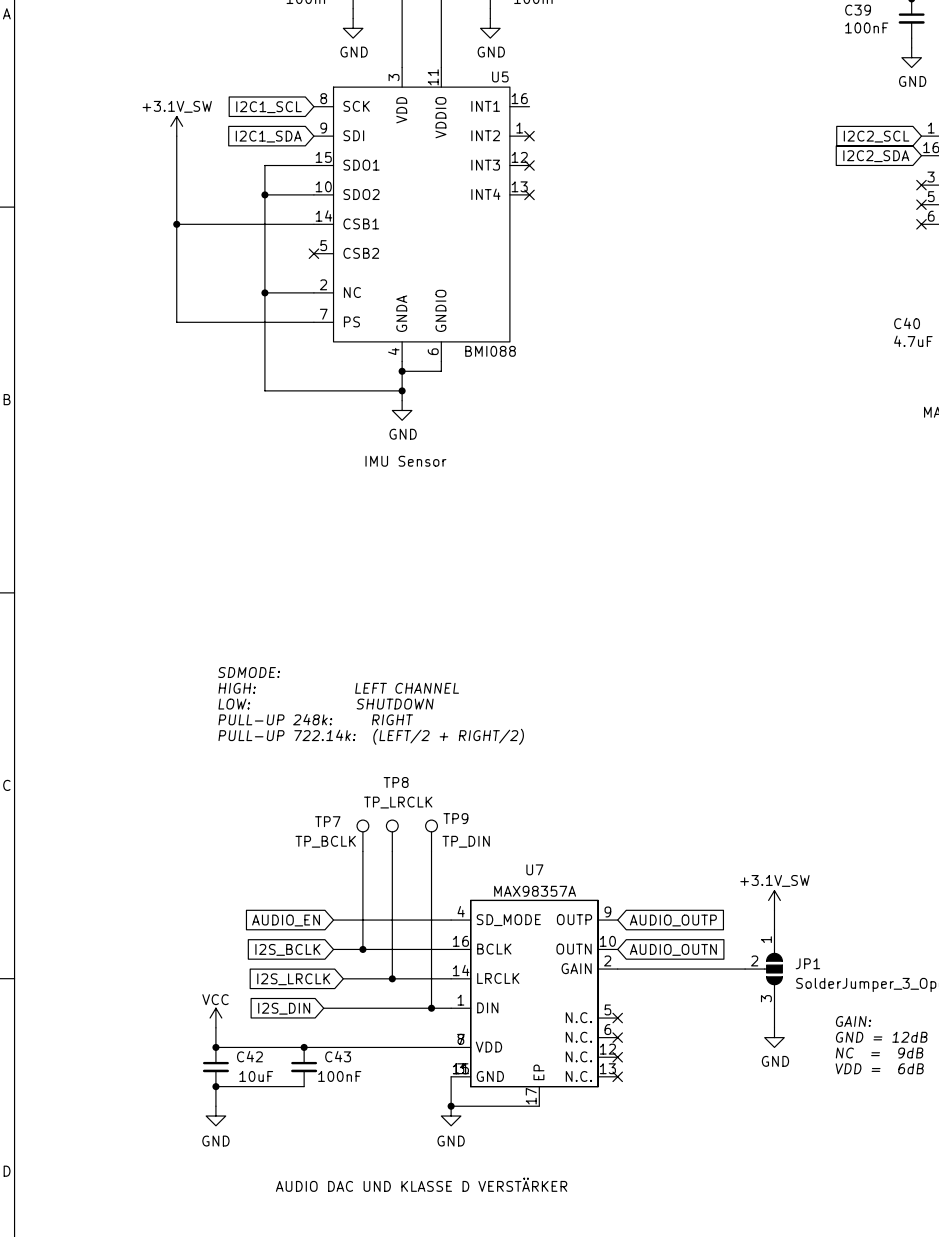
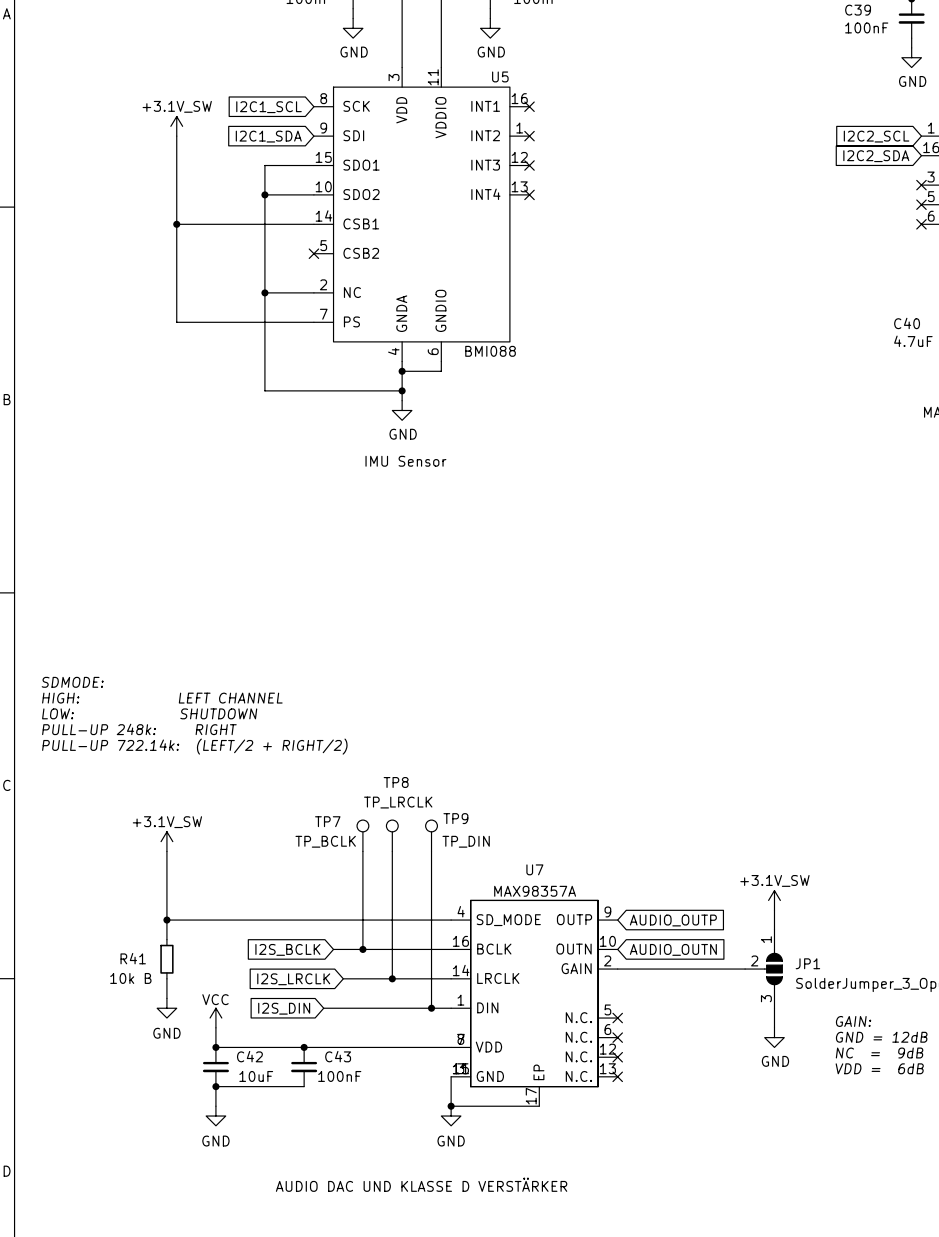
no-connect mark: none -> (529, 106)
text position: SDMODE: (249, 672) -> SDMODE: (72, 682)
text position: HIGH: LEFT CHANNEL (338, 688) -> HIGH: LEFT CHANNEL (162, 698)
text position: LOW: SHUTDOWN (326, 704) -> LOW: SHUTDOWN (149, 713)
text position: PULL-UP 248k: RIGHT (315, 719) -> PULL-UP 248k: RIGHT (139, 729)
text position: PULL-UP 722.14k: (LEFT/2 + RIGHT/2) (371, 736) -> PULL-UP 722.14k: (LEFT/2 + RIGHT/2) (194, 746)
power symbol: none -> +3.1V_SW (166, 841)
wire: none -> (166, 851) (166, 939)
wire: none -> (166, 920) (333, 920)
junction: none -> (166, 920)
global label: AUDIO_EN (286, 920) -> none
R41: none -> 10k B (166, 959)
wire: none -> (166, 978) (166, 998)
power symbol: none -> GND (166, 1008)

